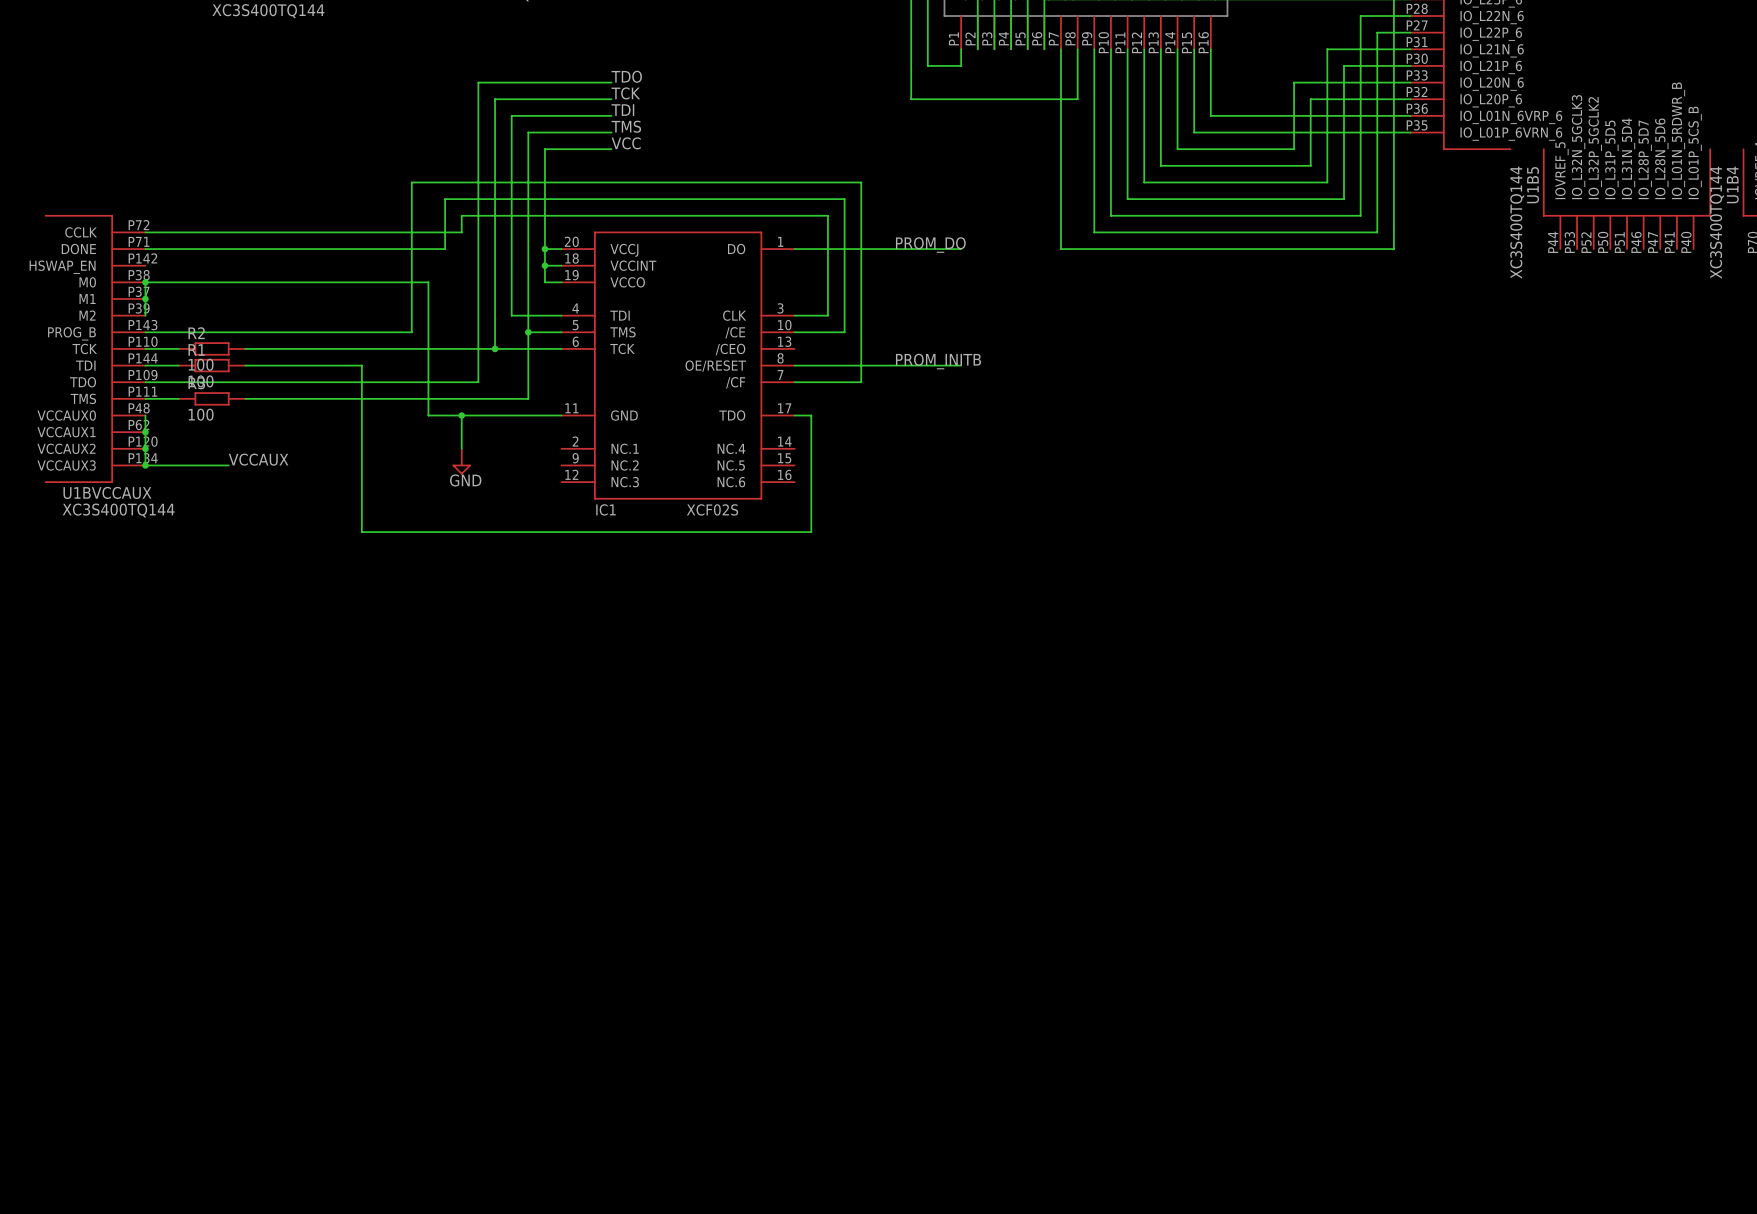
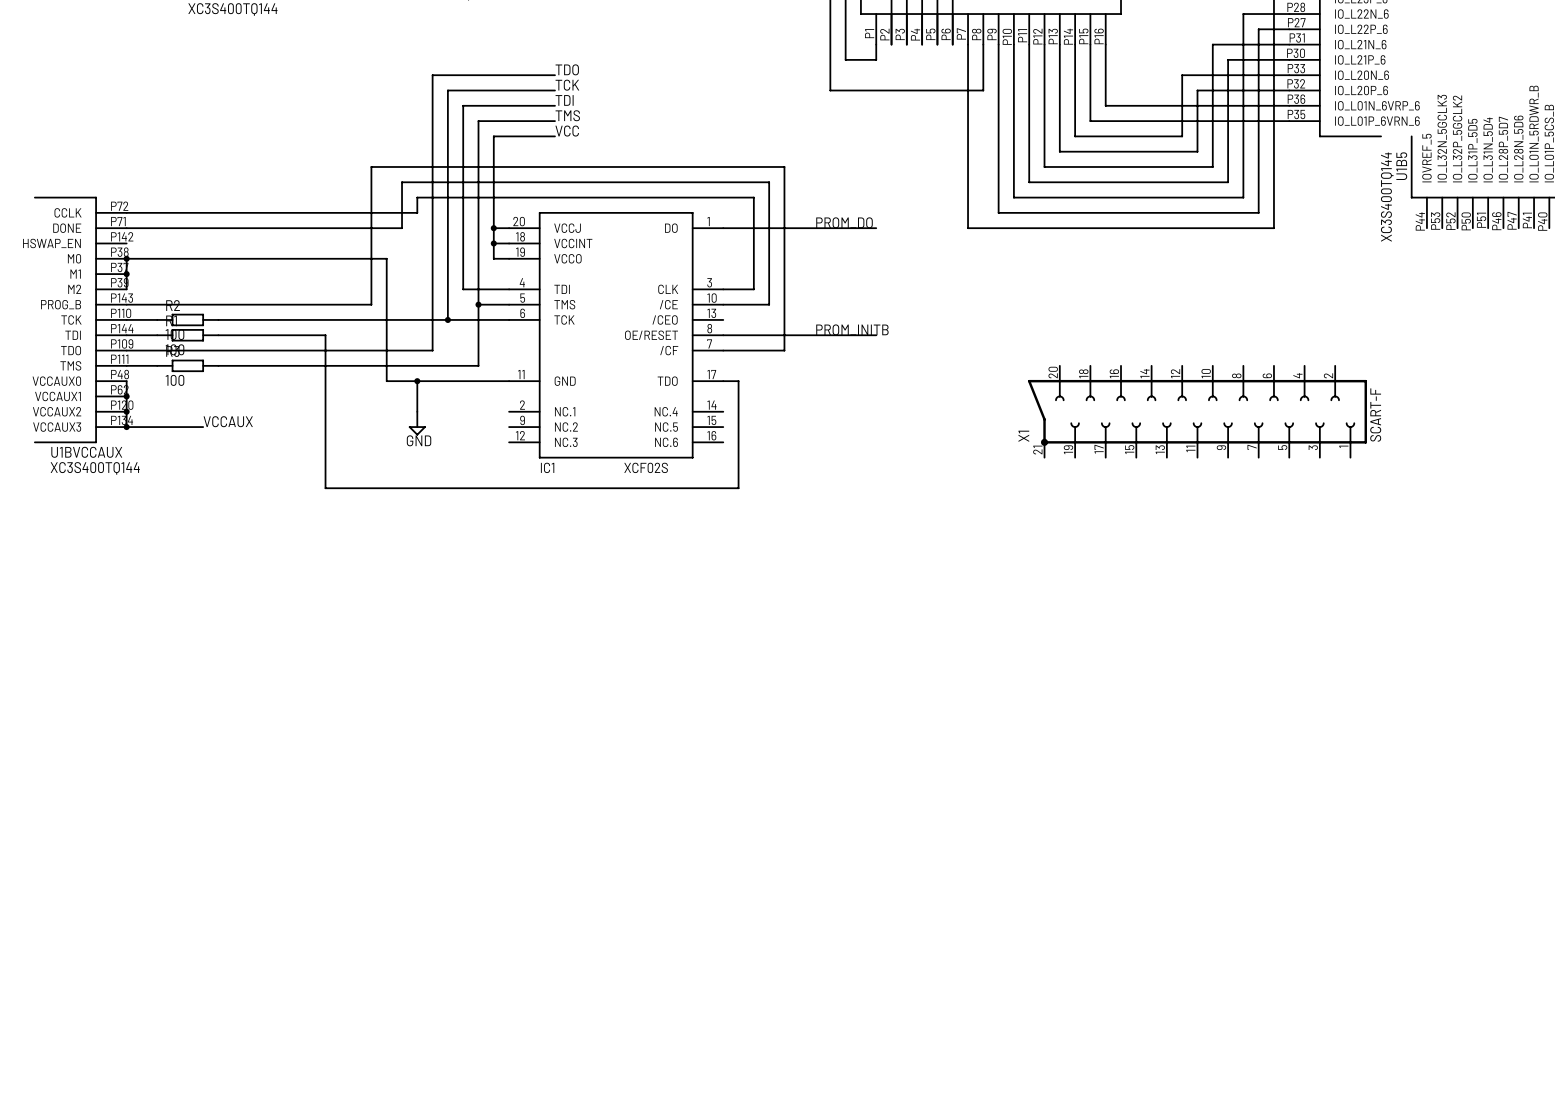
X1: none -> SCART-F (1197, 411)

